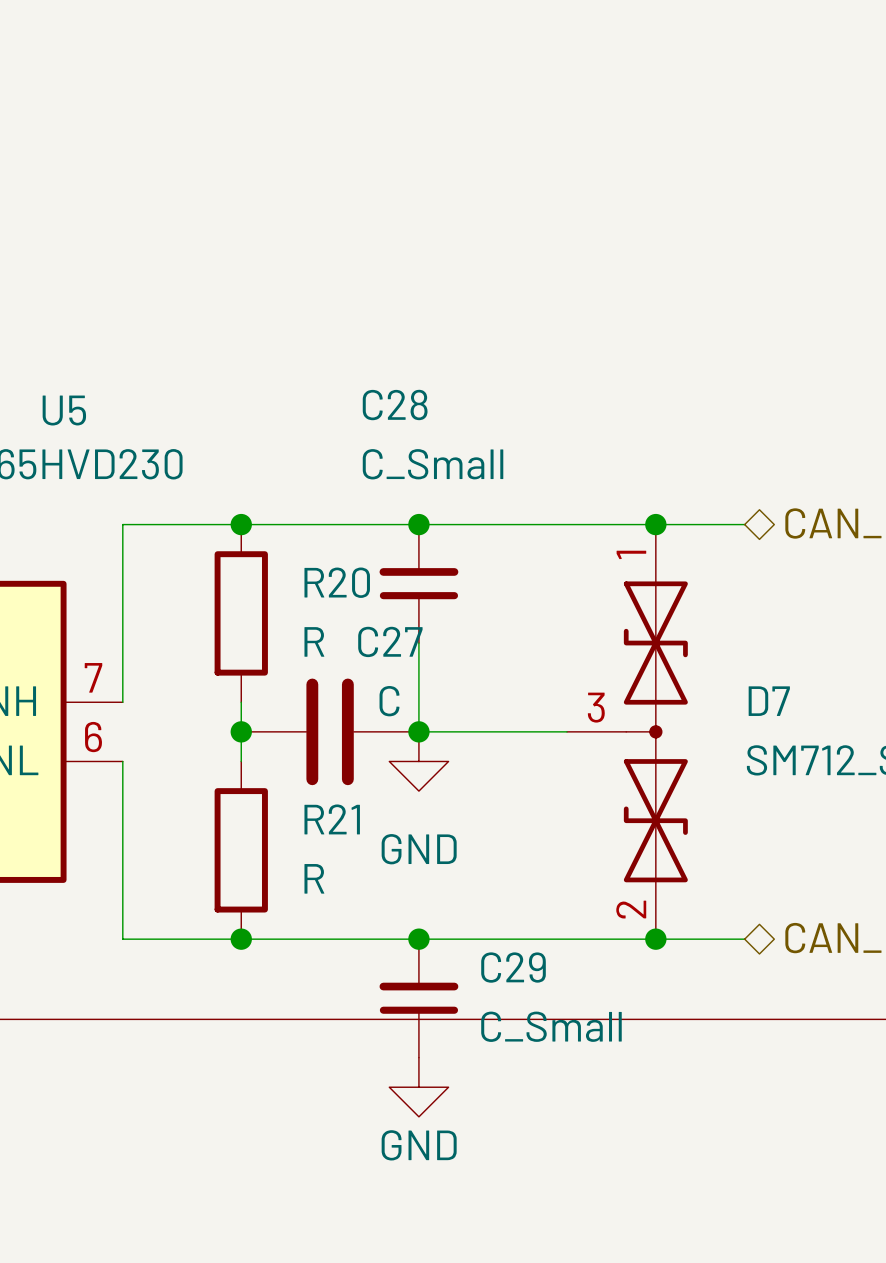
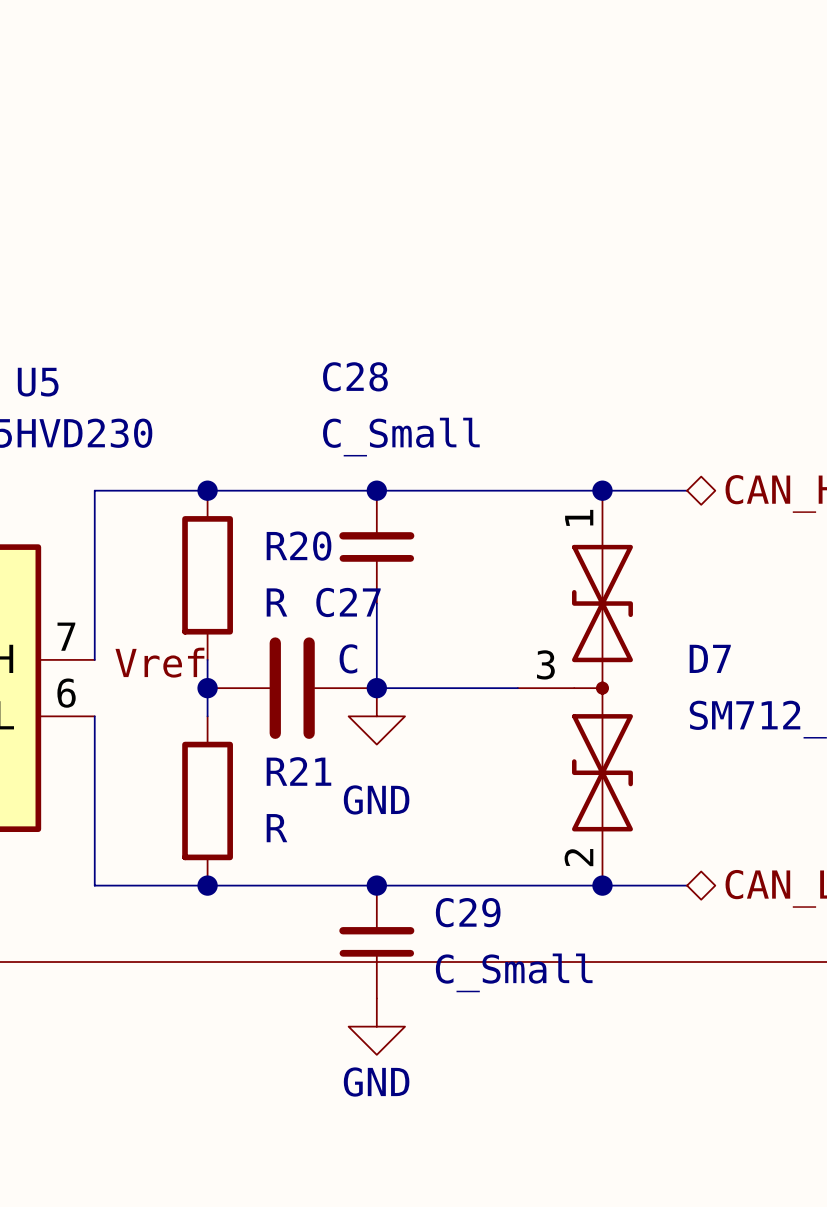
label: none -> Vref (159, 662)

